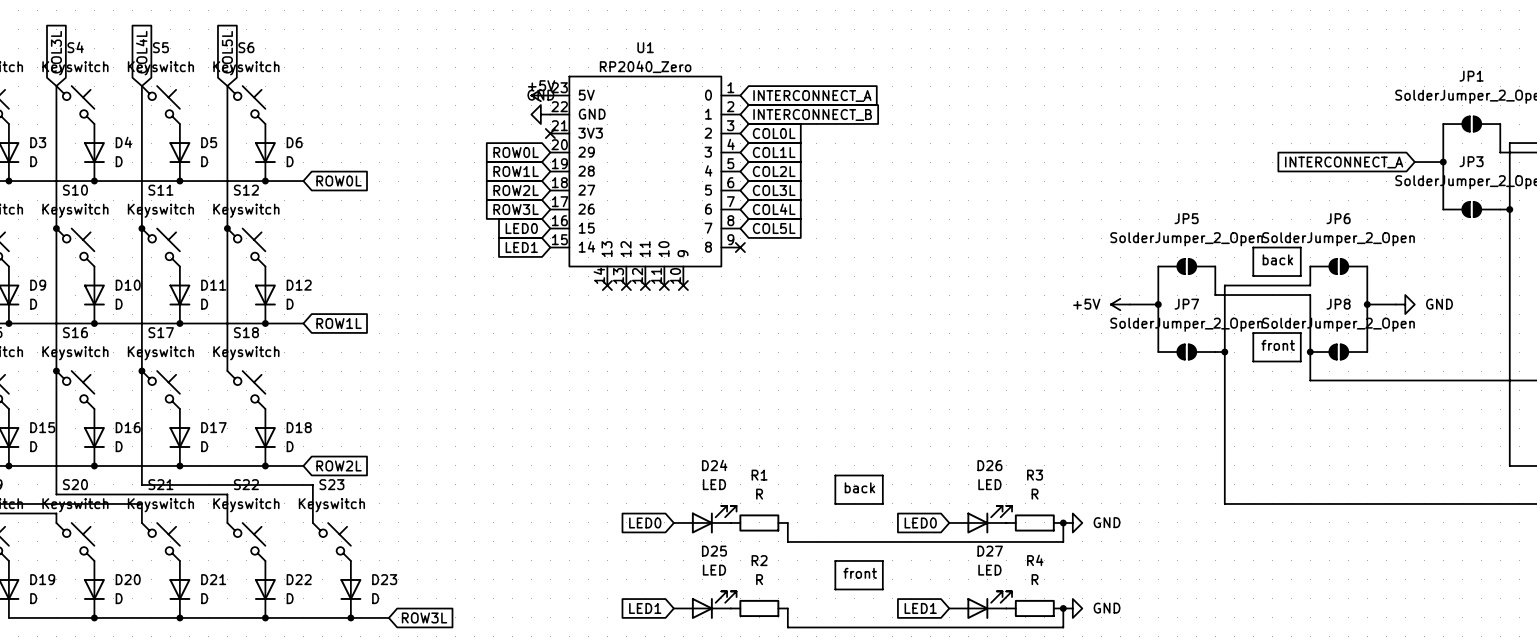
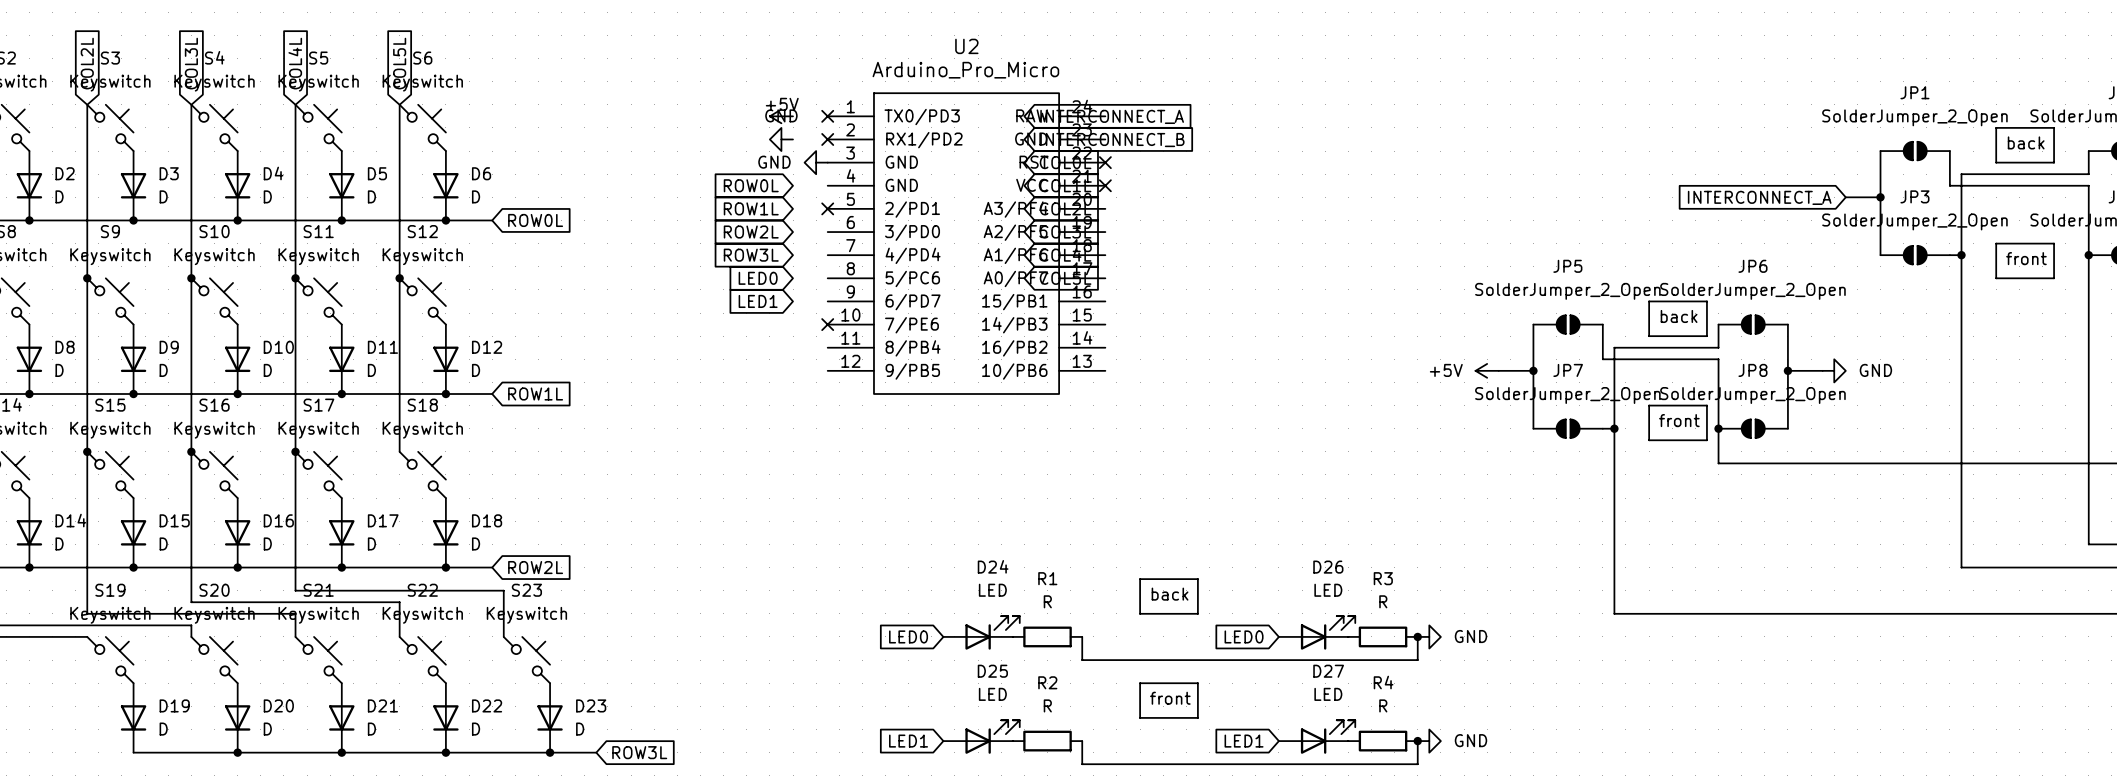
no-connect mark: none -> (827, 116)
no-connect mark: none -> (827, 139)
no-connect mark: (550, 133) -> none
power symbol: none -> GND (816, 162)
no-connect mark: none -> (1105, 162)
no-connect mark: none -> (1105, 185)
no-connect mark: none -> (827, 208)
U1: RP2040_Zero (645, 181) -> none
U2: none -> Arduino_Pro_Micro (966, 243)
no-connect mark: (740, 247) -> none
no-connect mark: none -> (827, 324)
no-connect mark: (607, 285) -> none
no-connect mark: (626, 285) -> none
no-connect mark: (645, 285) -> none
no-connect mark: (664, 285) -> none
no-connect mark: (683, 285) -> none

